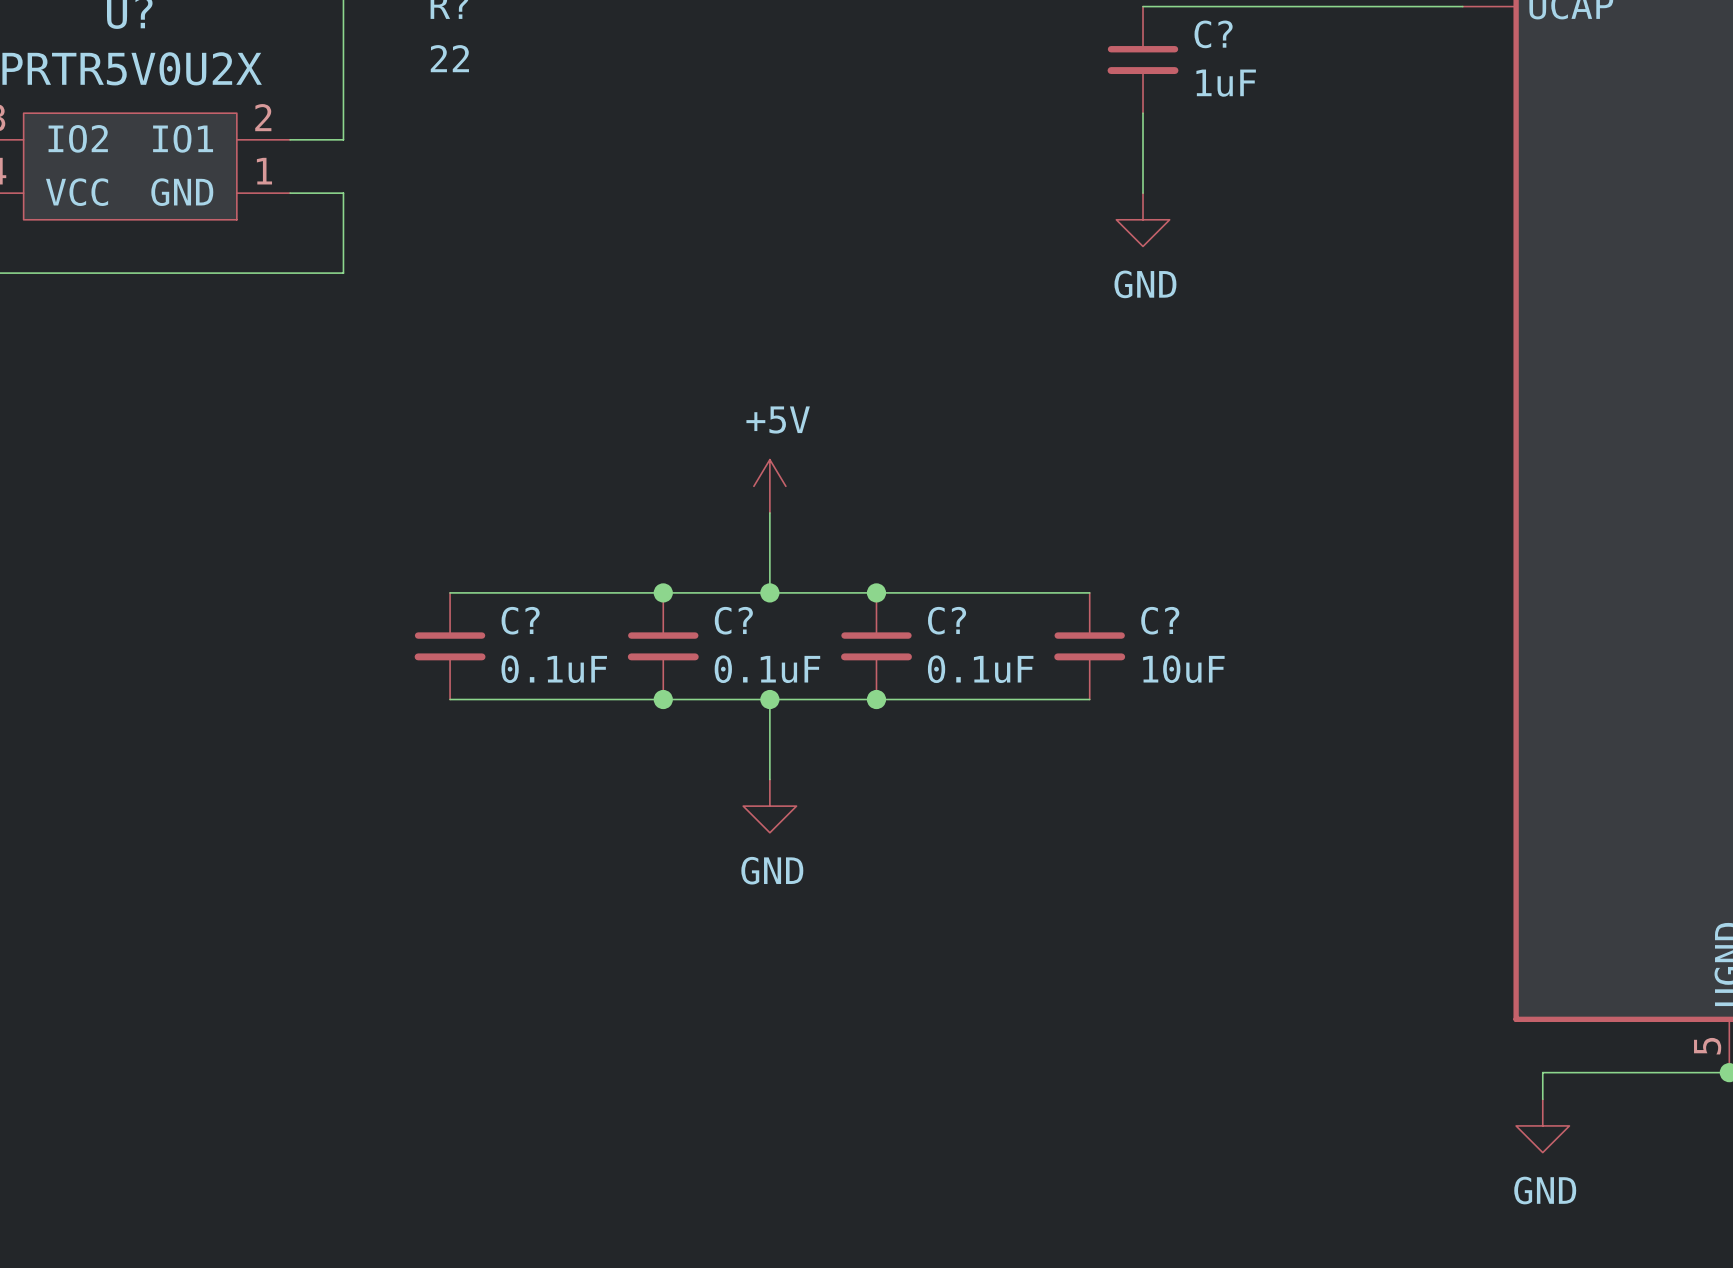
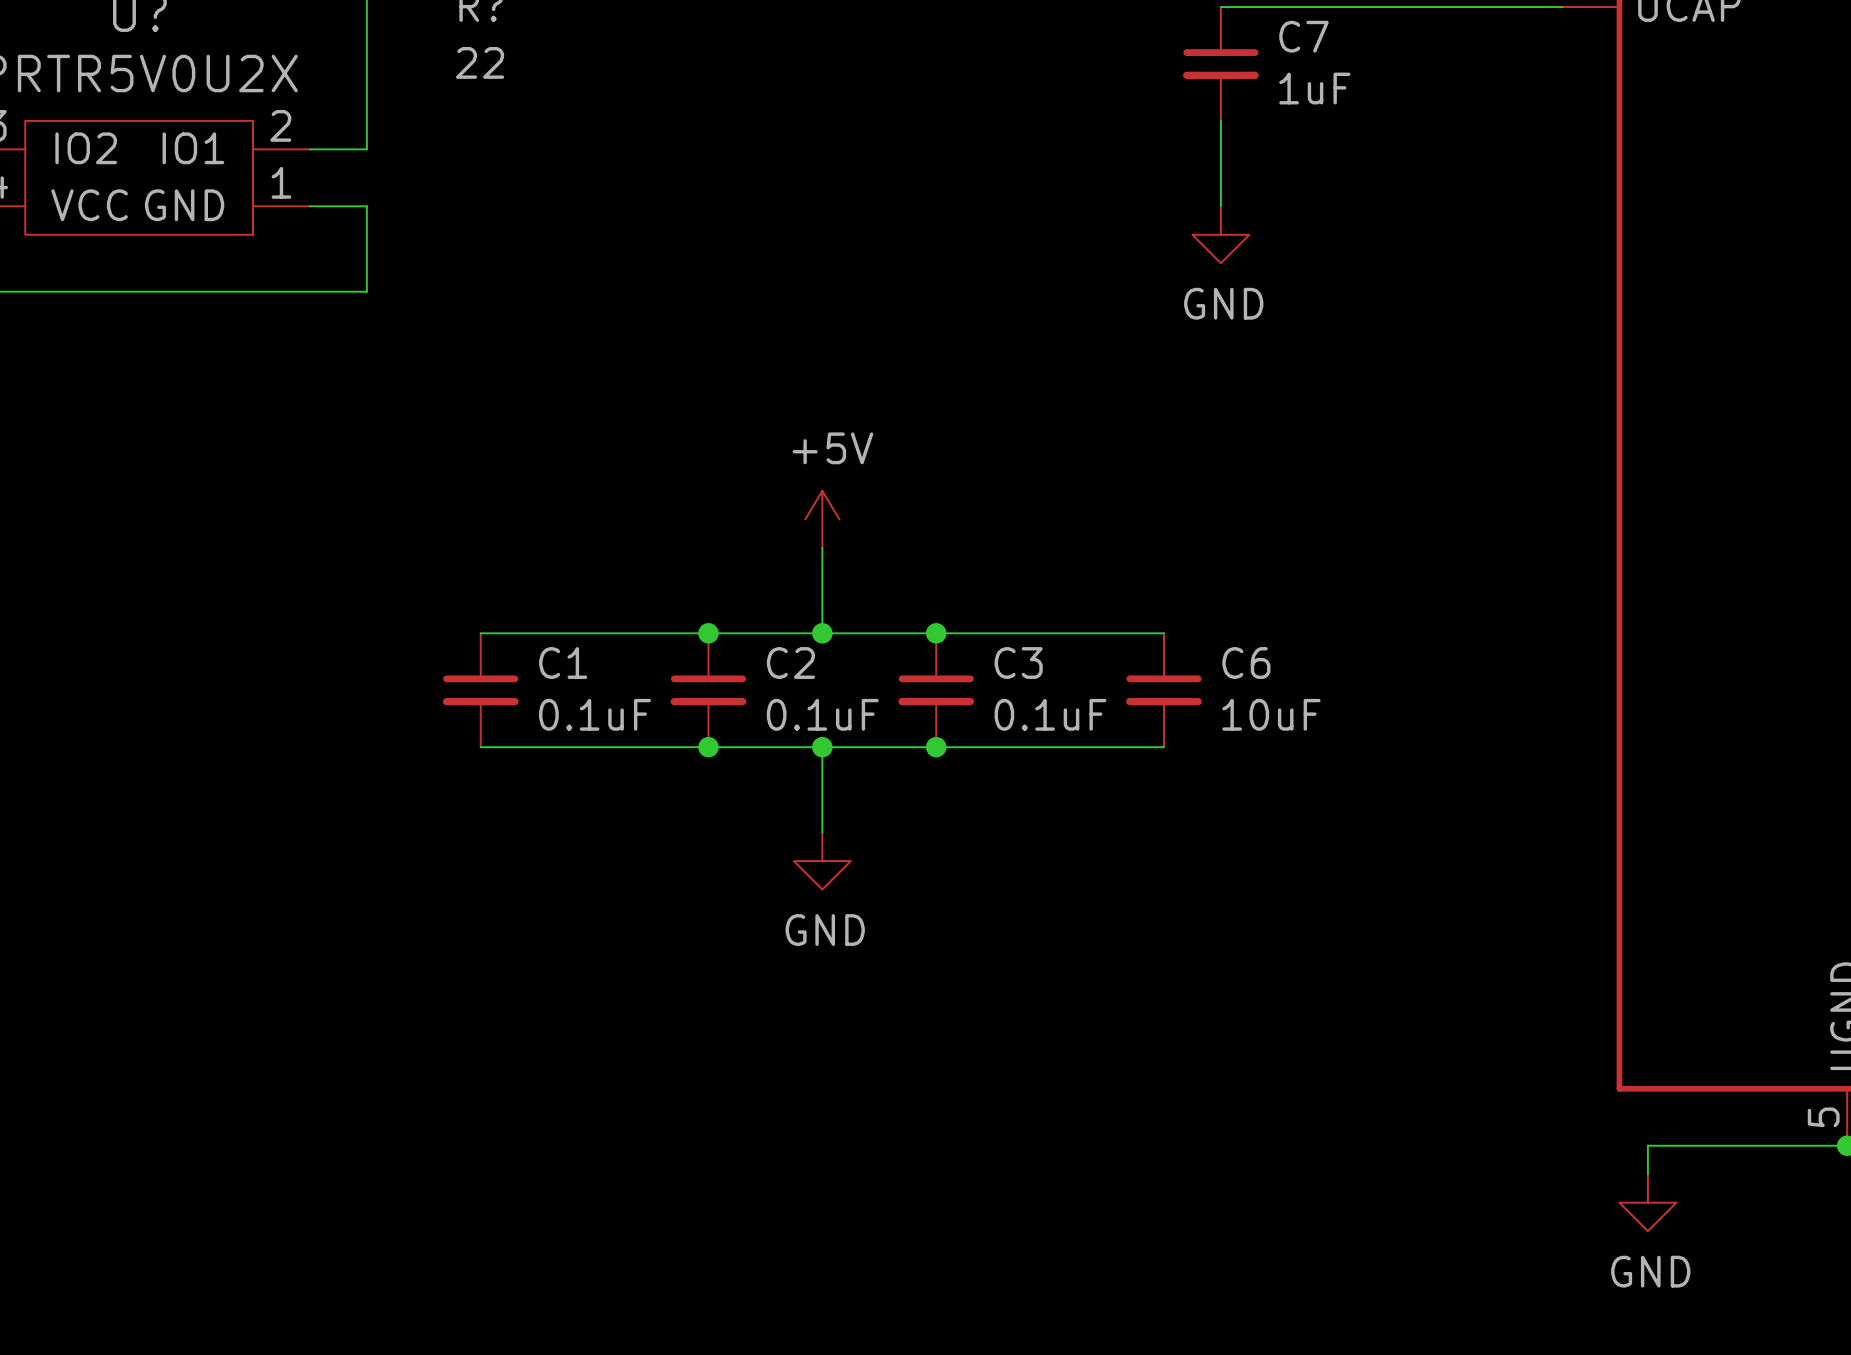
C? name: C? (1213, 34) -> C7 (1303, 36)
C? name: C? (520, 620) -> C1 (563, 663)
C? name: C? (733, 620) -> C2 (790, 663)
C? name: C? (947, 620) -> C3 (1018, 663)
C? name: C? (1160, 620) -> C6 (1246, 663)

